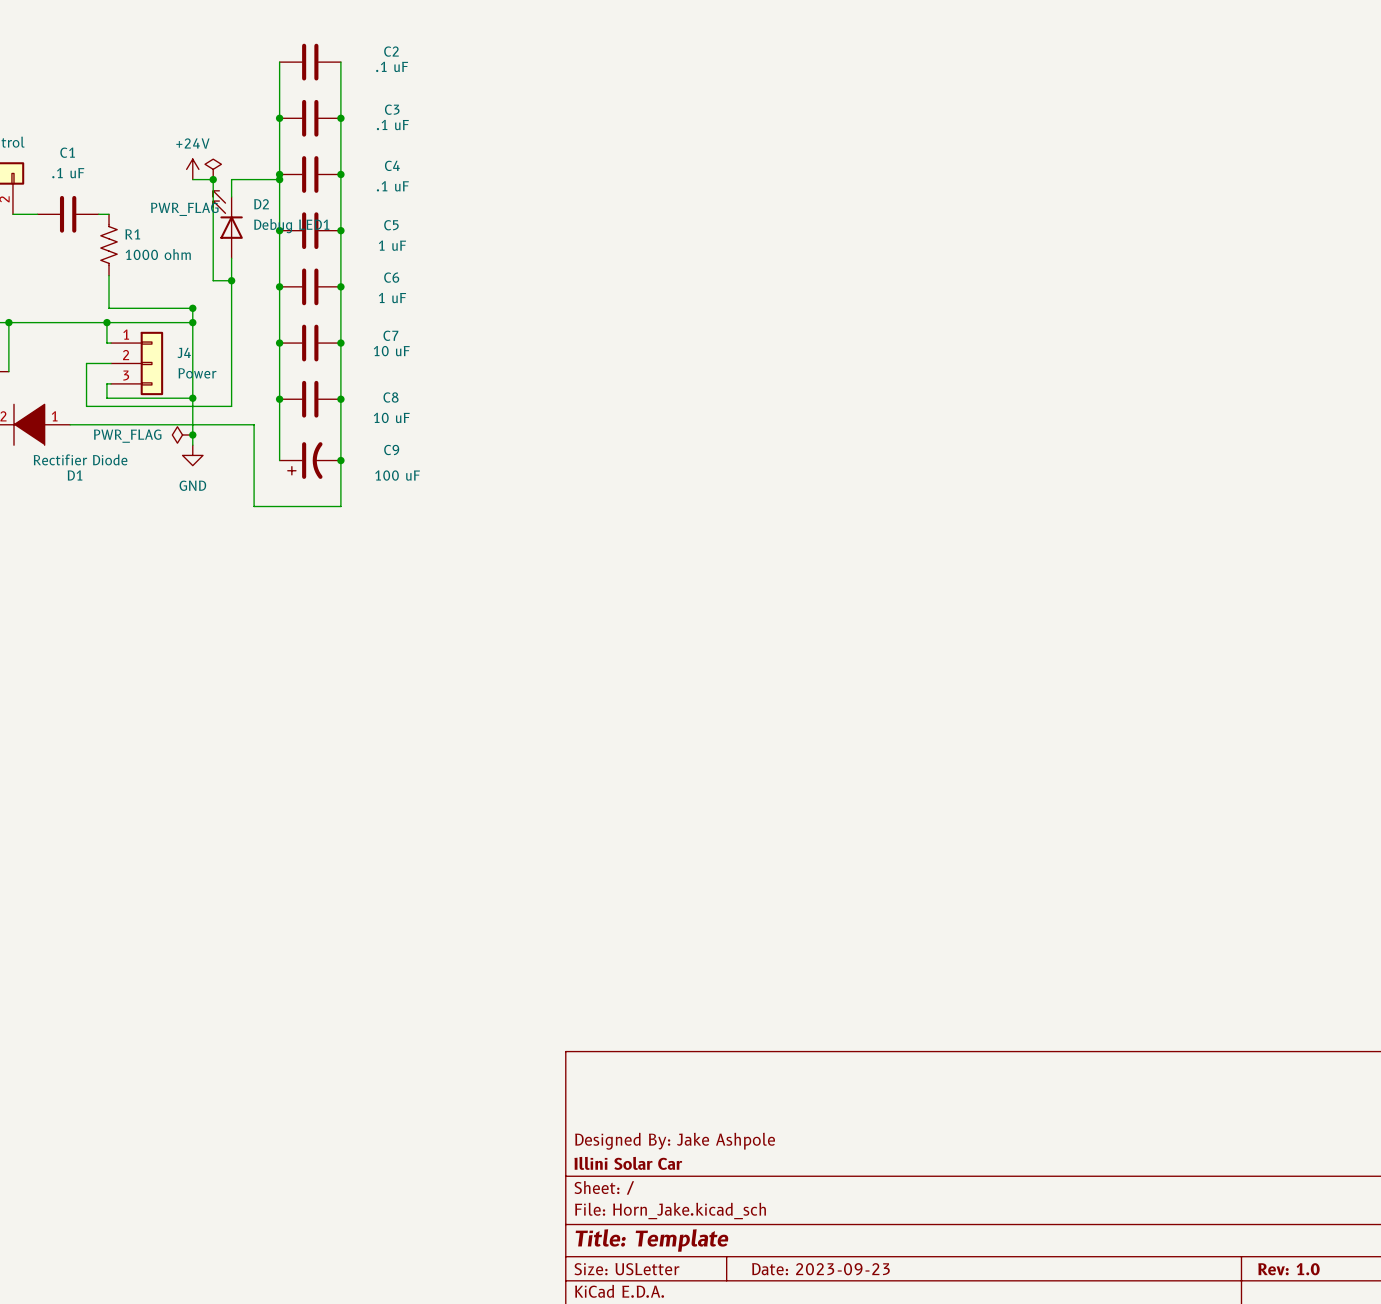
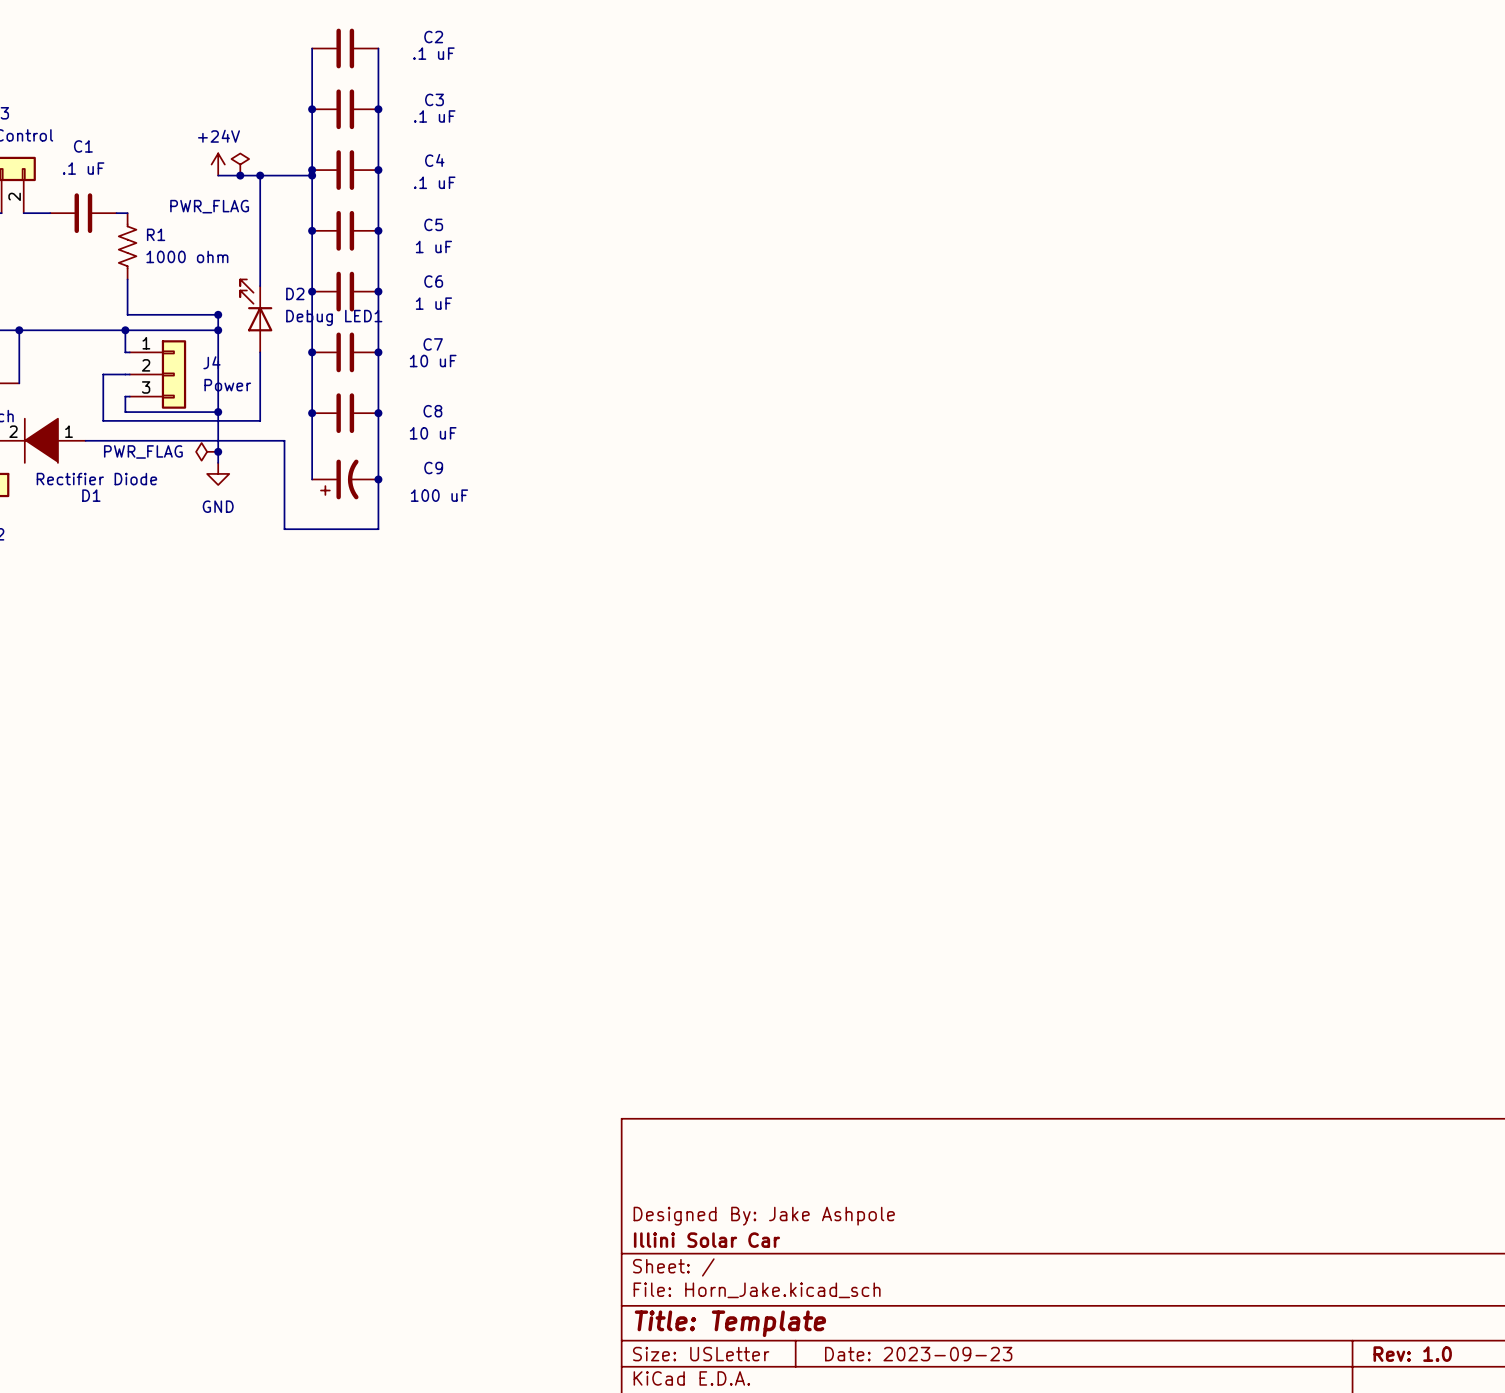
wire: (213, 179) (213, 280) (231, 280) -> (240, 175) (260, 175)
junction: none -> (260, 175)
D2 position: (228, 224) -> (256, 315)
junction: (231, 280) -> none

